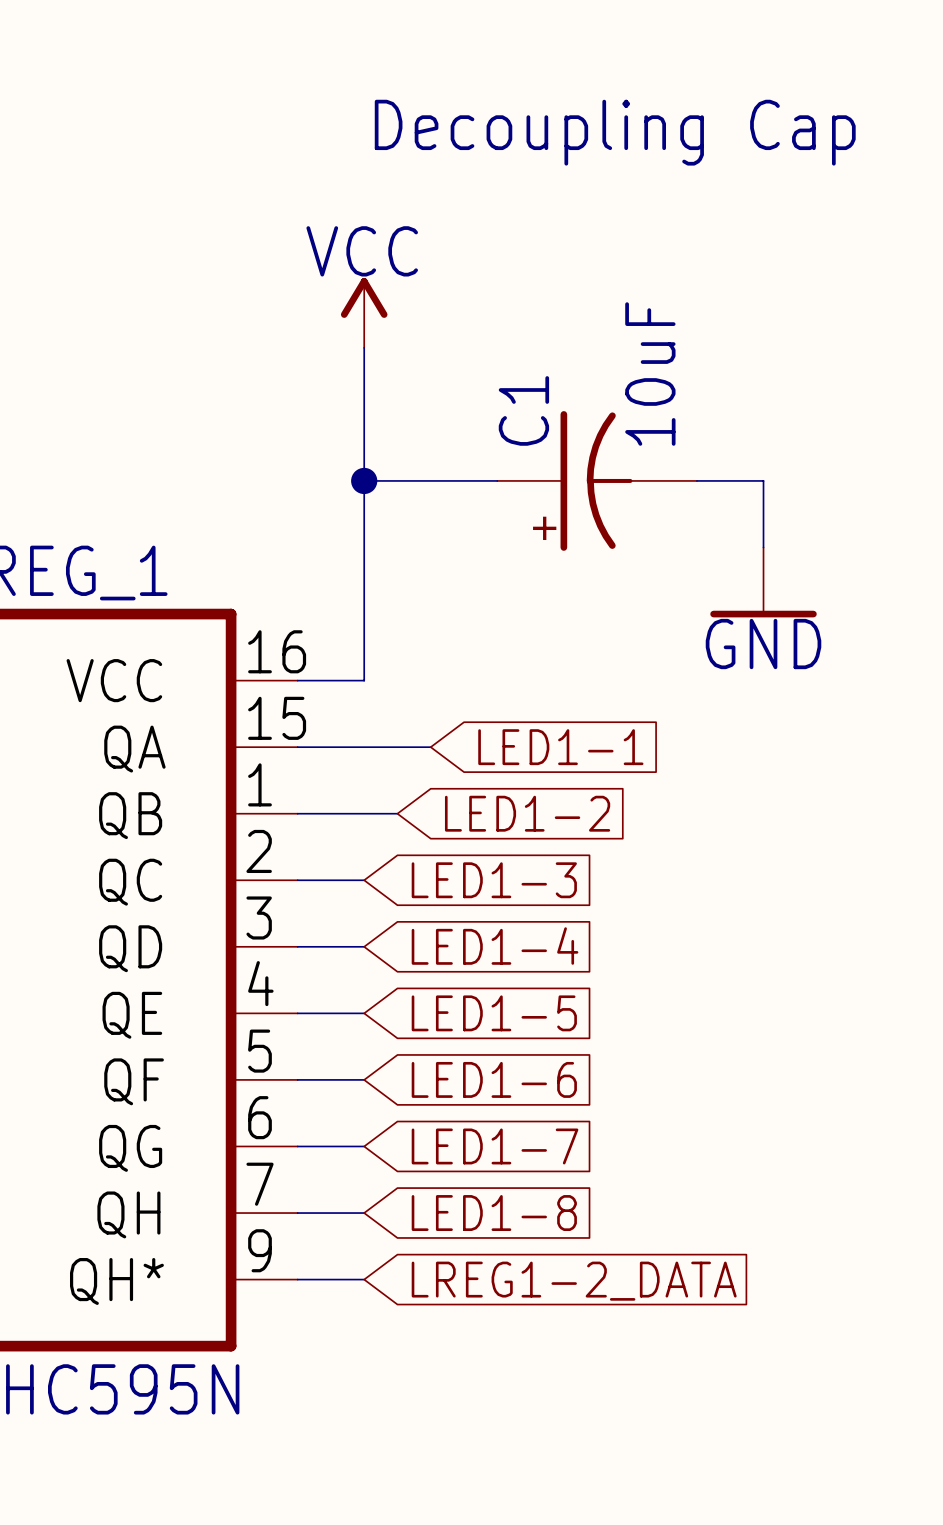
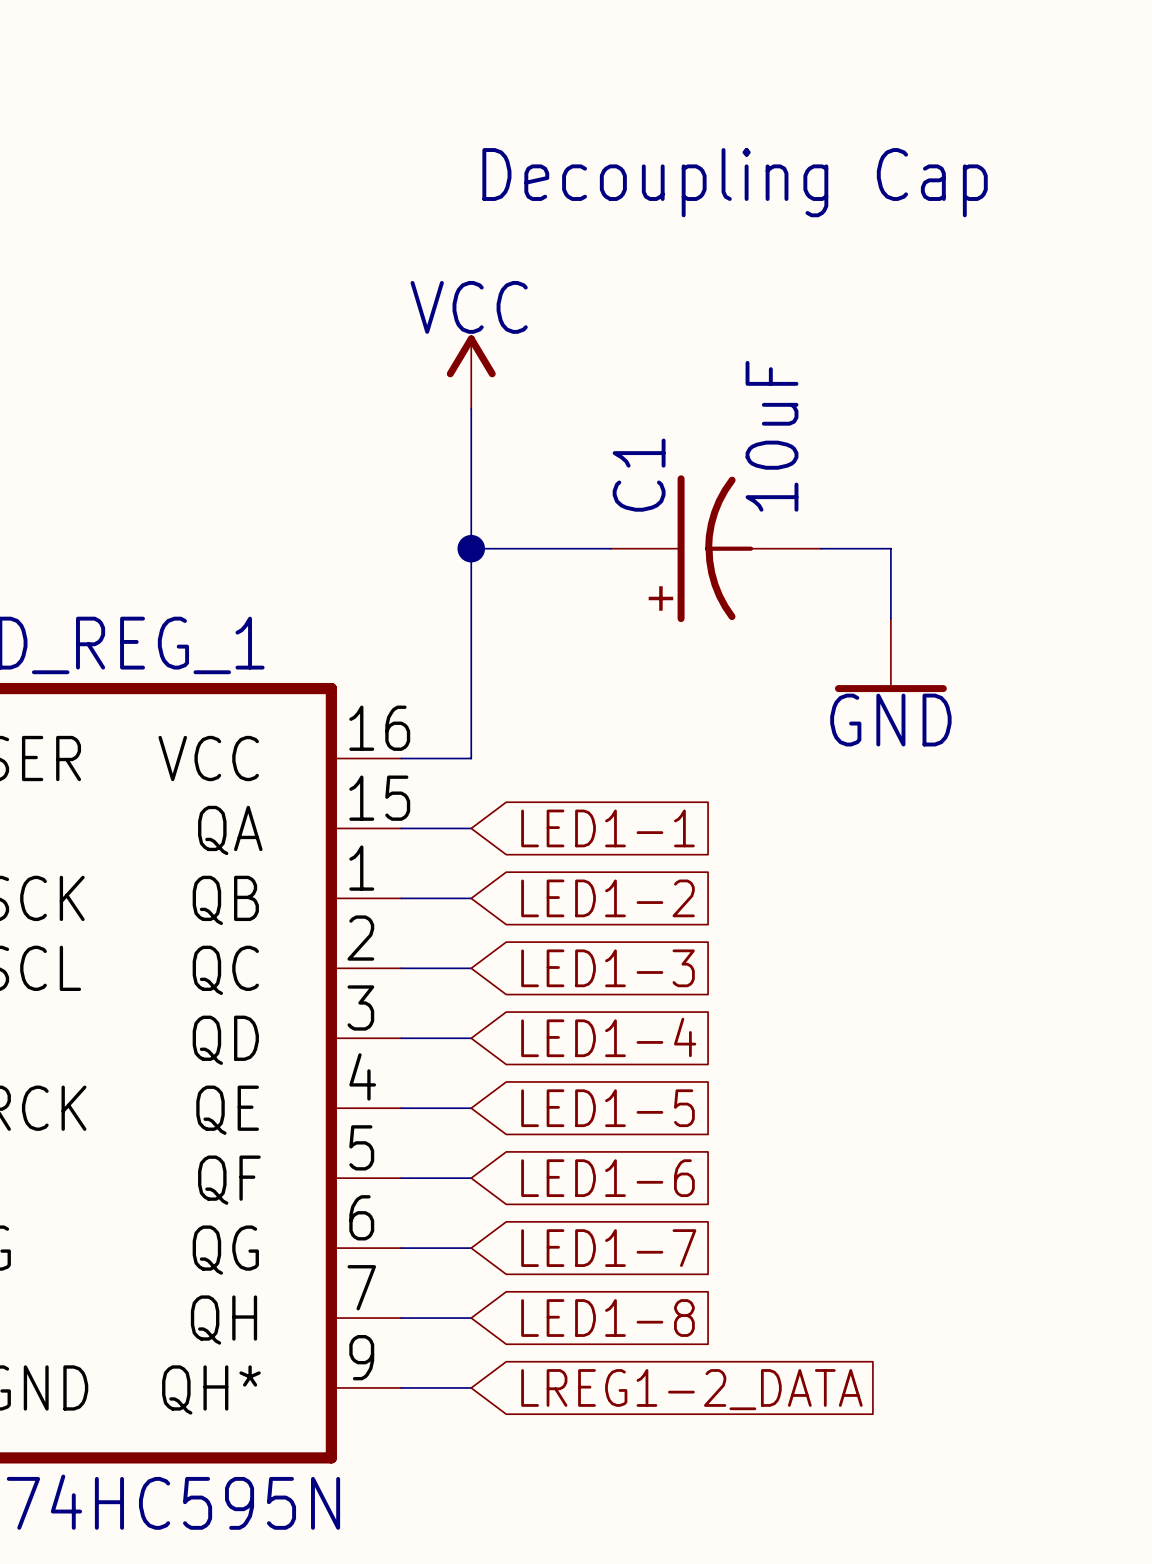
wire: (364, 747) (430, 747) -> none
global label position: LED1-1 (560, 747) -> LED1-1 (607, 828)
wire: (364, 813) (397, 813) -> none
global label position: LED1-2 (527, 813) -> LED1-2 (607, 898)

